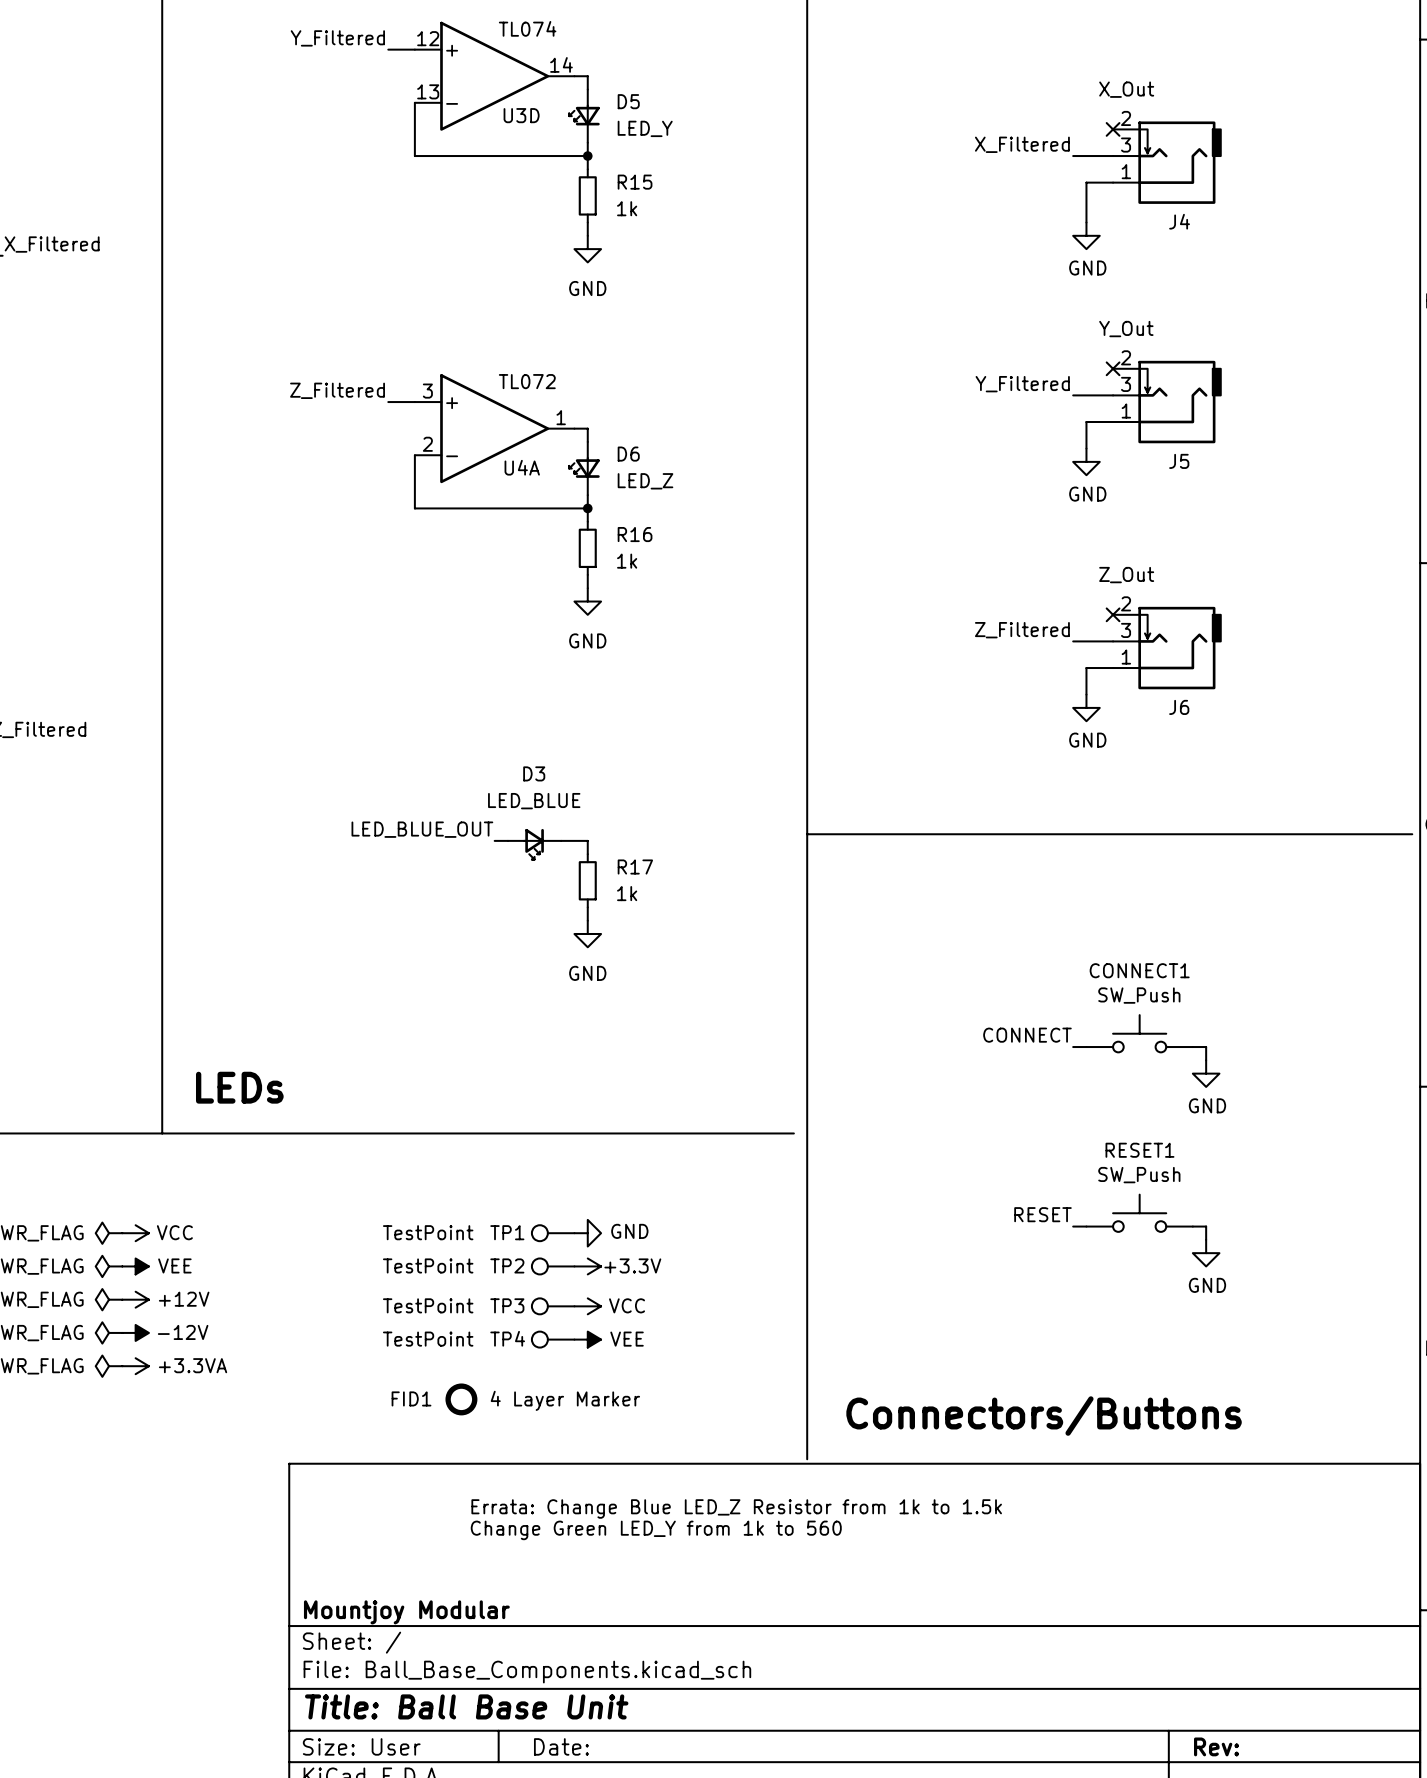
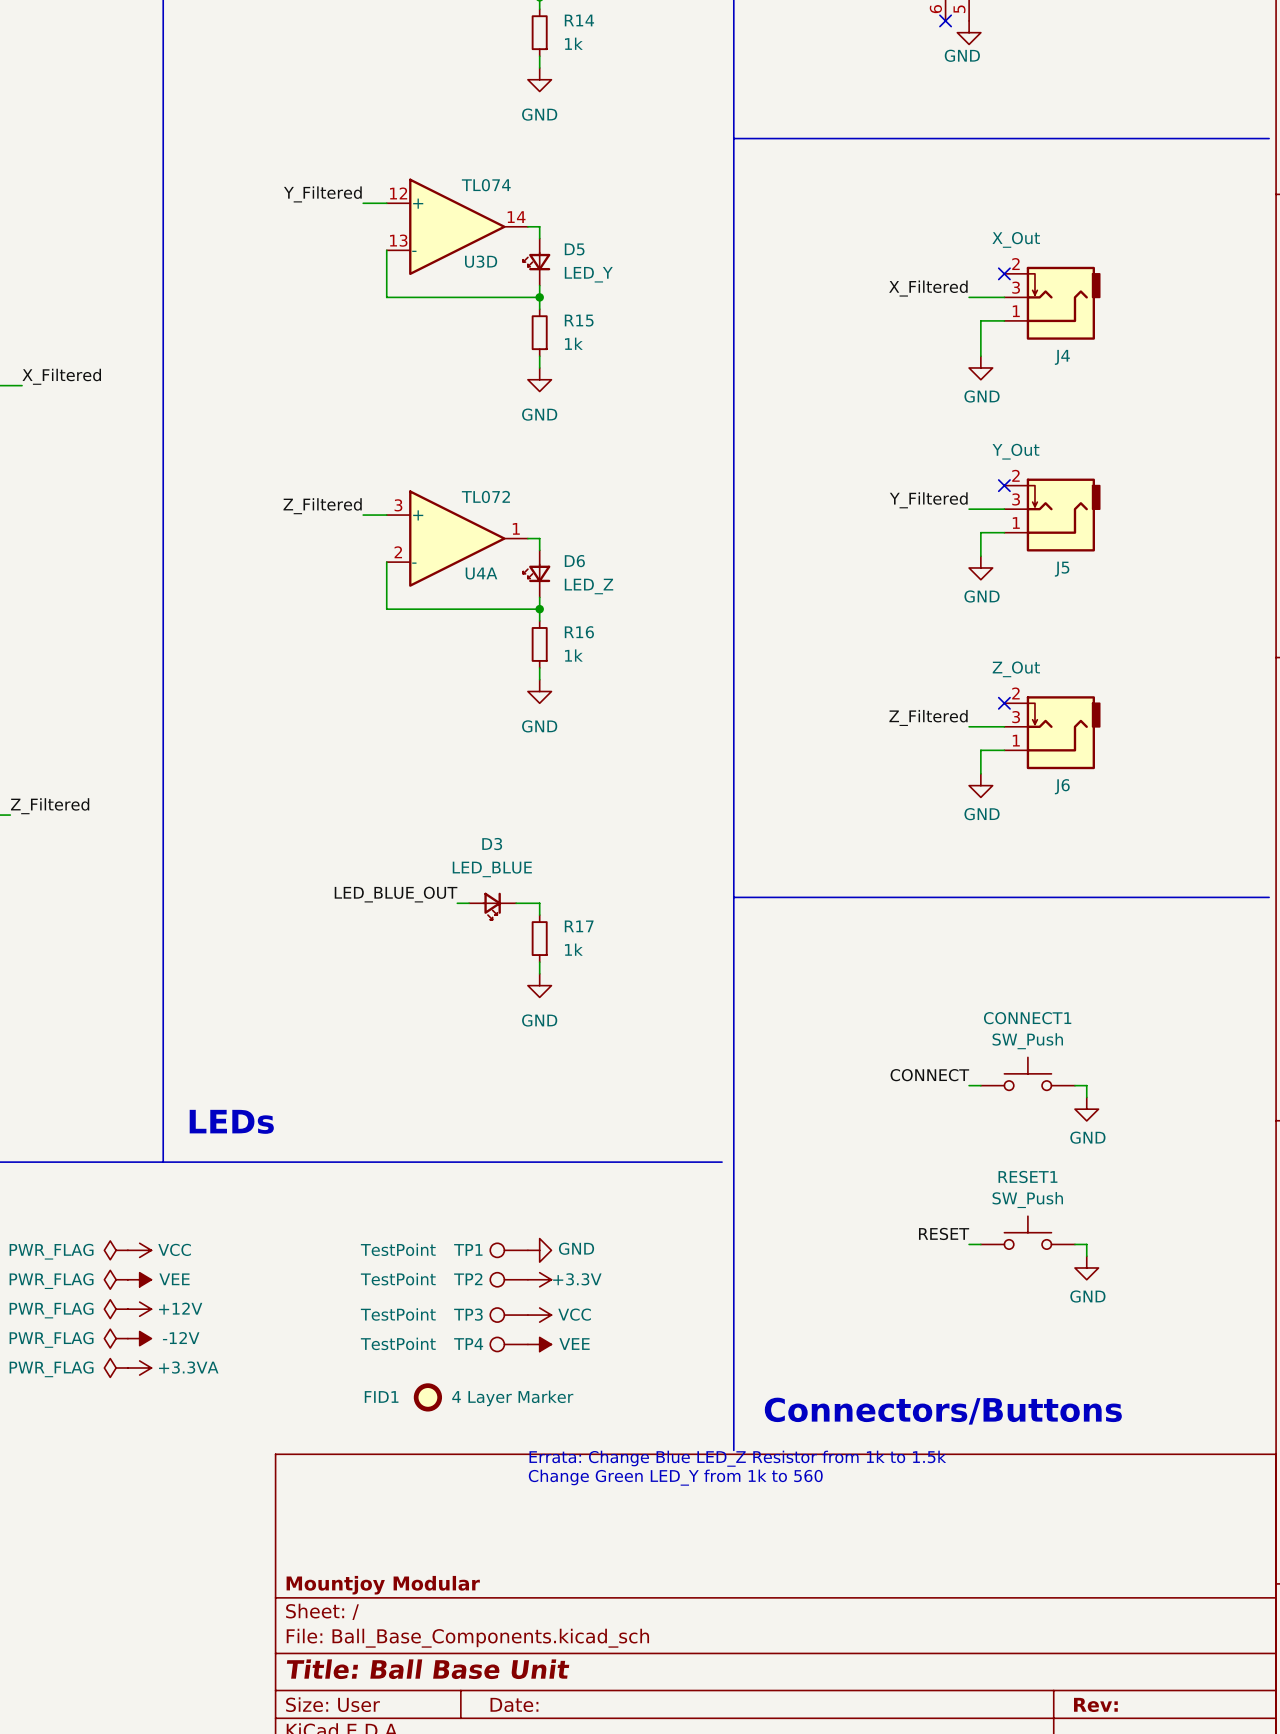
text position: Errata: Change Blue LED_Z Resistor from 1k to 1.5k (736, 1508) -> Errata: Change Blue LED_Z Resistor from 1k to 1.5k (737, 1458)
text position: Change Green LED_Y from 1k to 560 (656, 1530) -> Change Green LED_Y from 1k to 560 (675, 1477)

